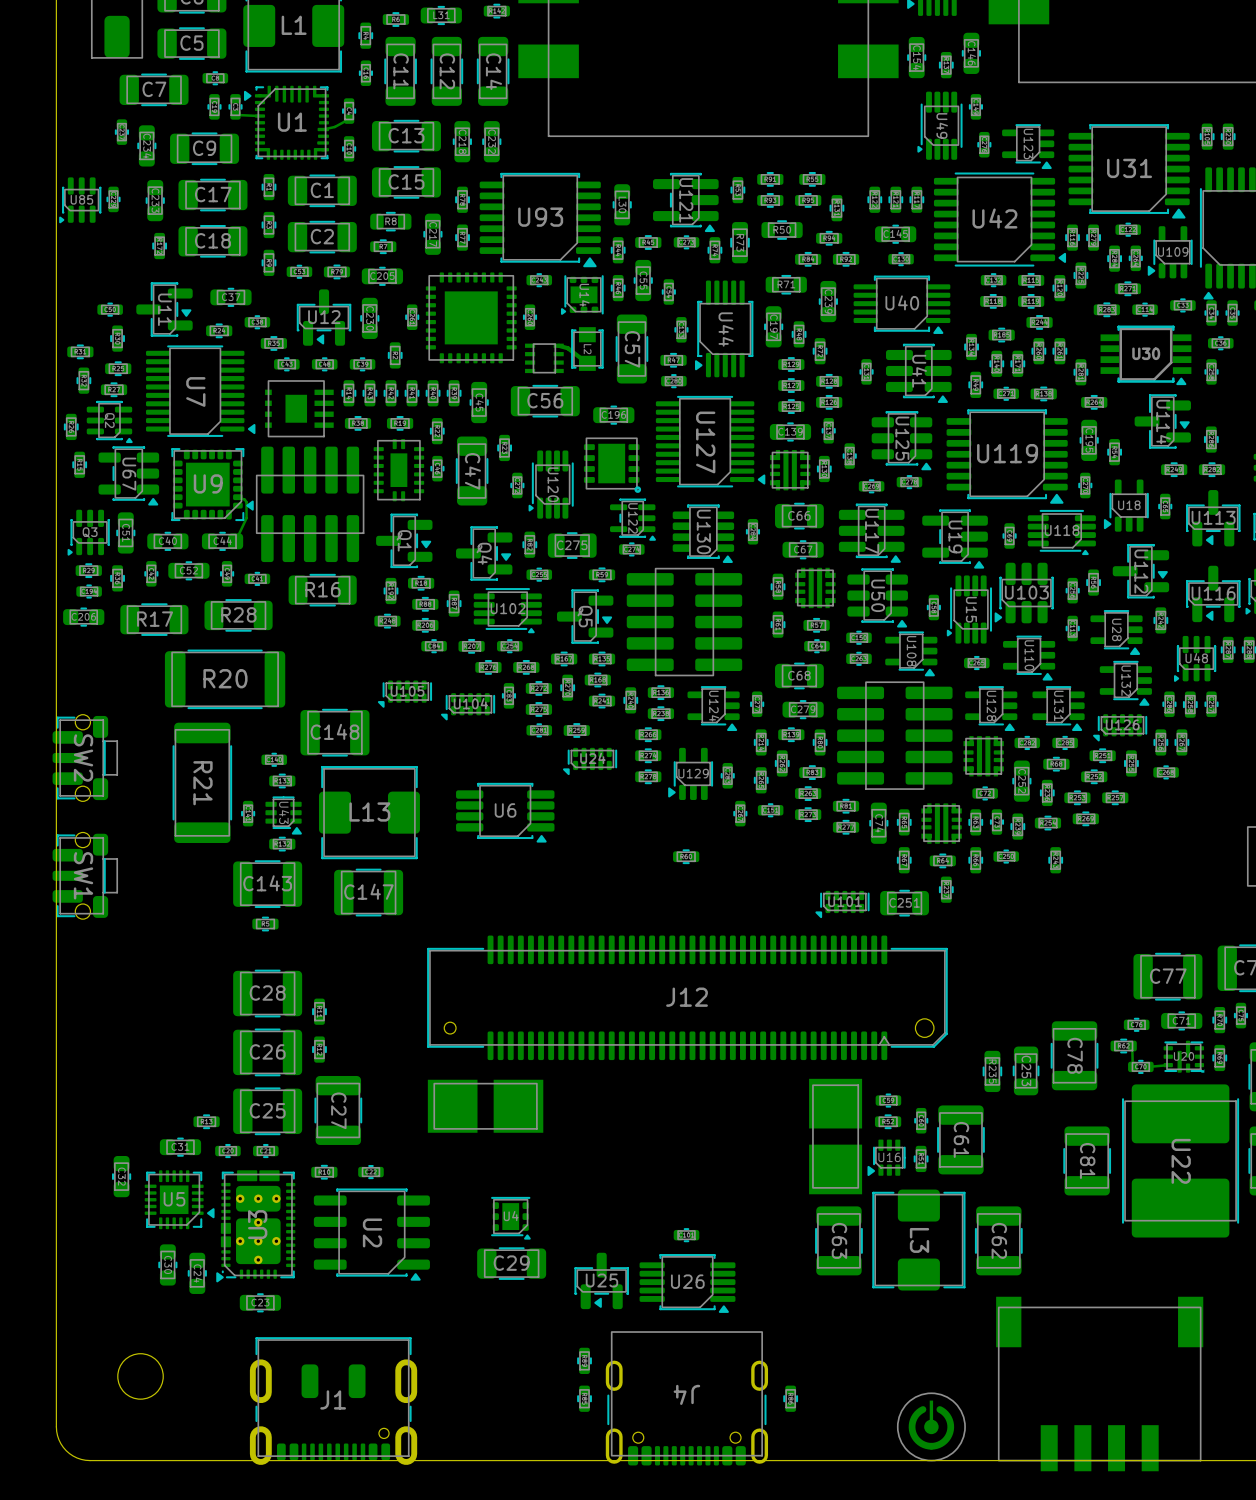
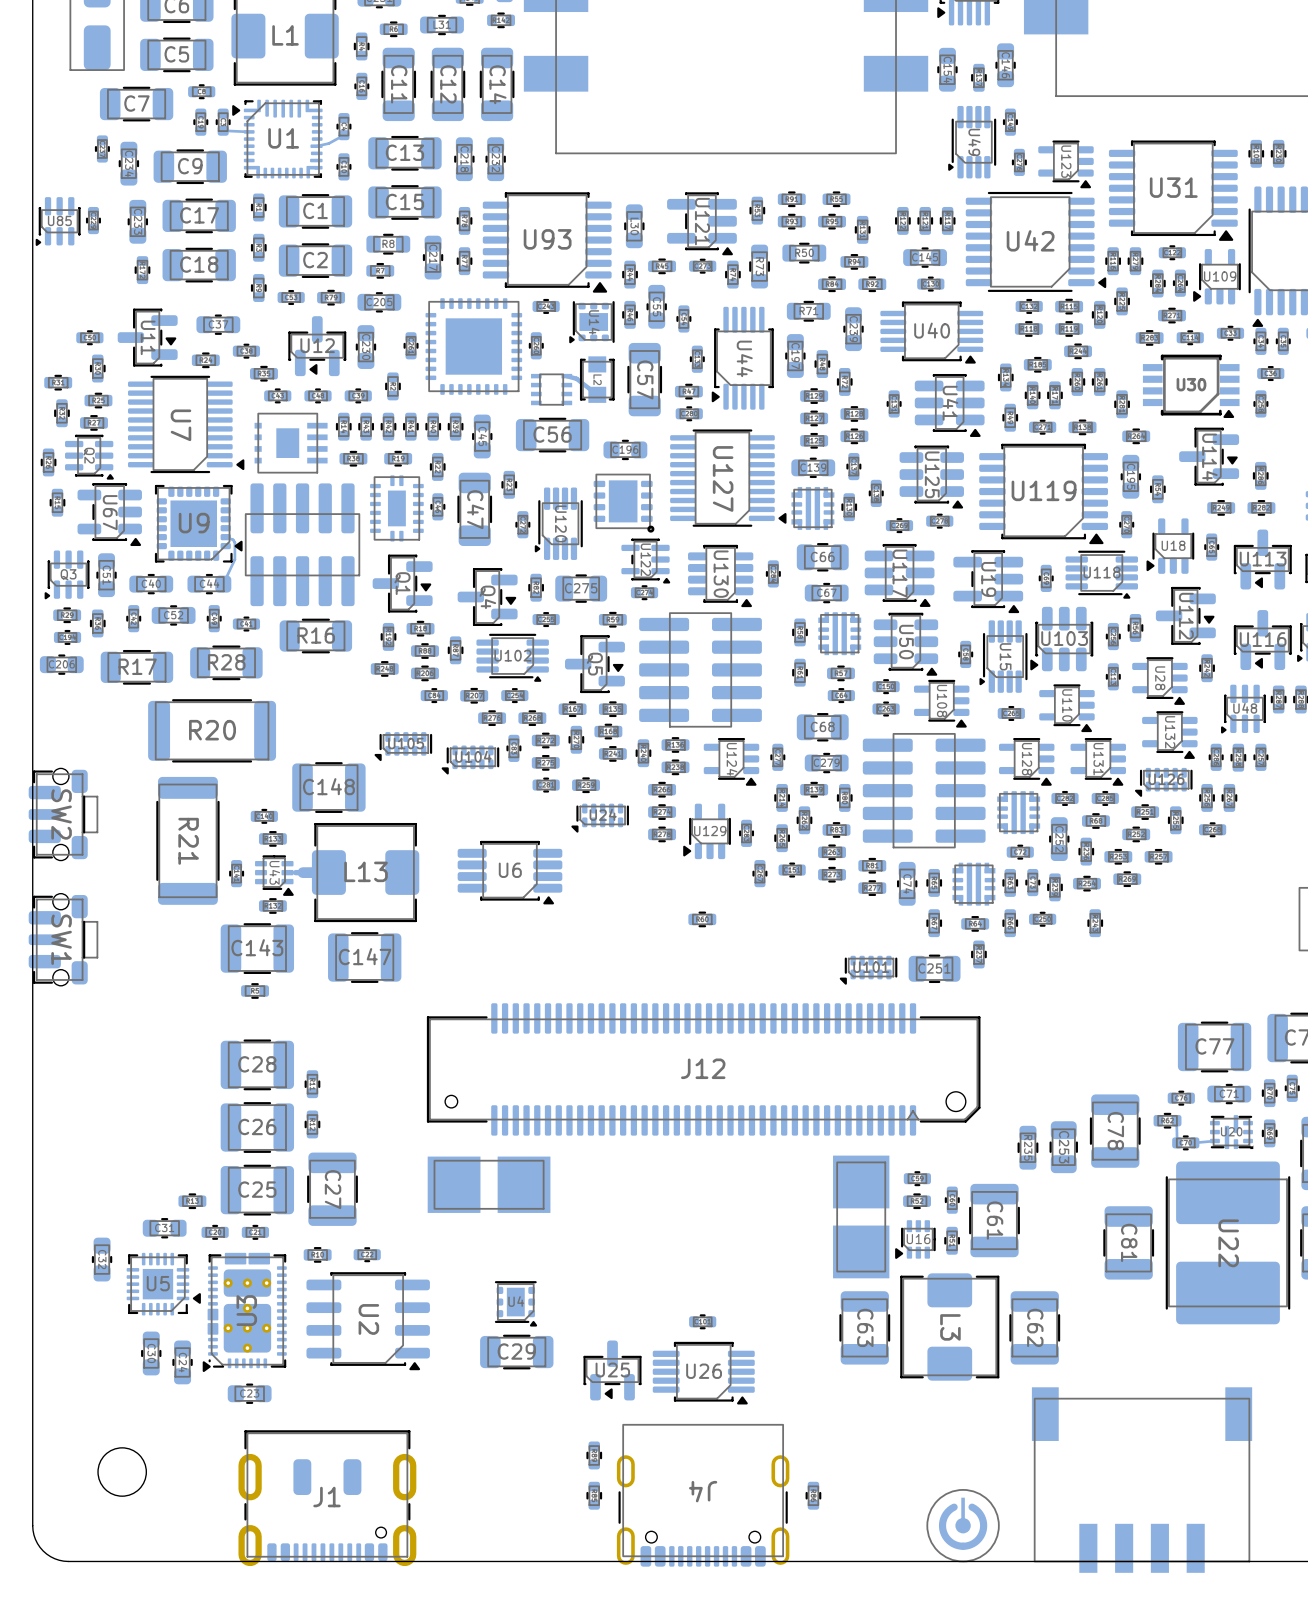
track: none -> (328, 872) (287, 872)

